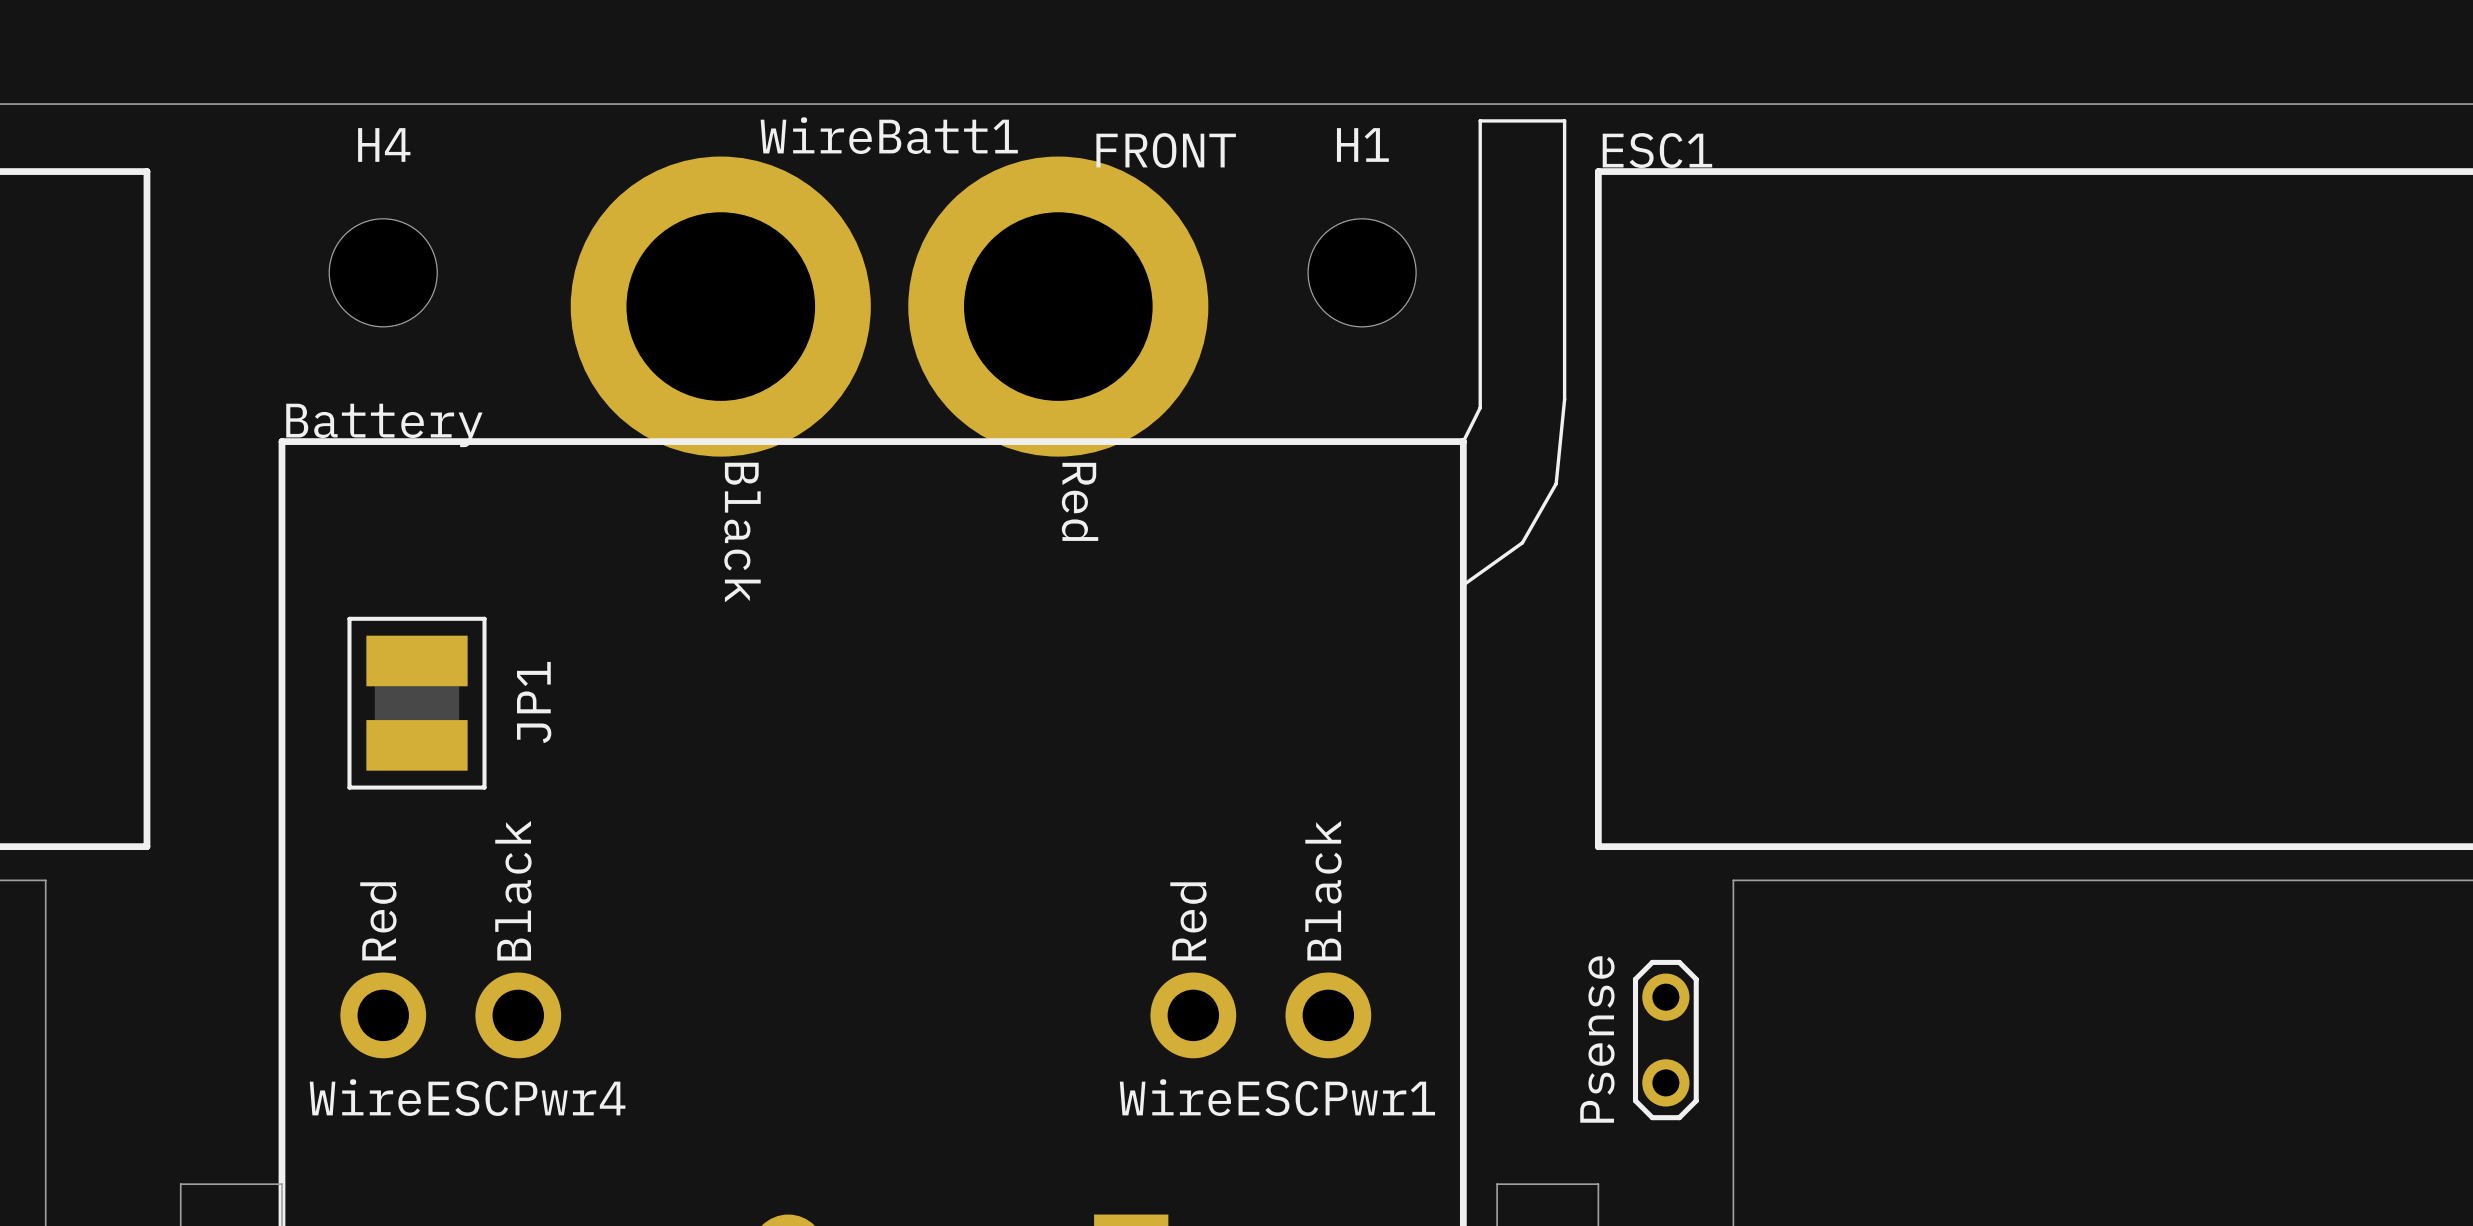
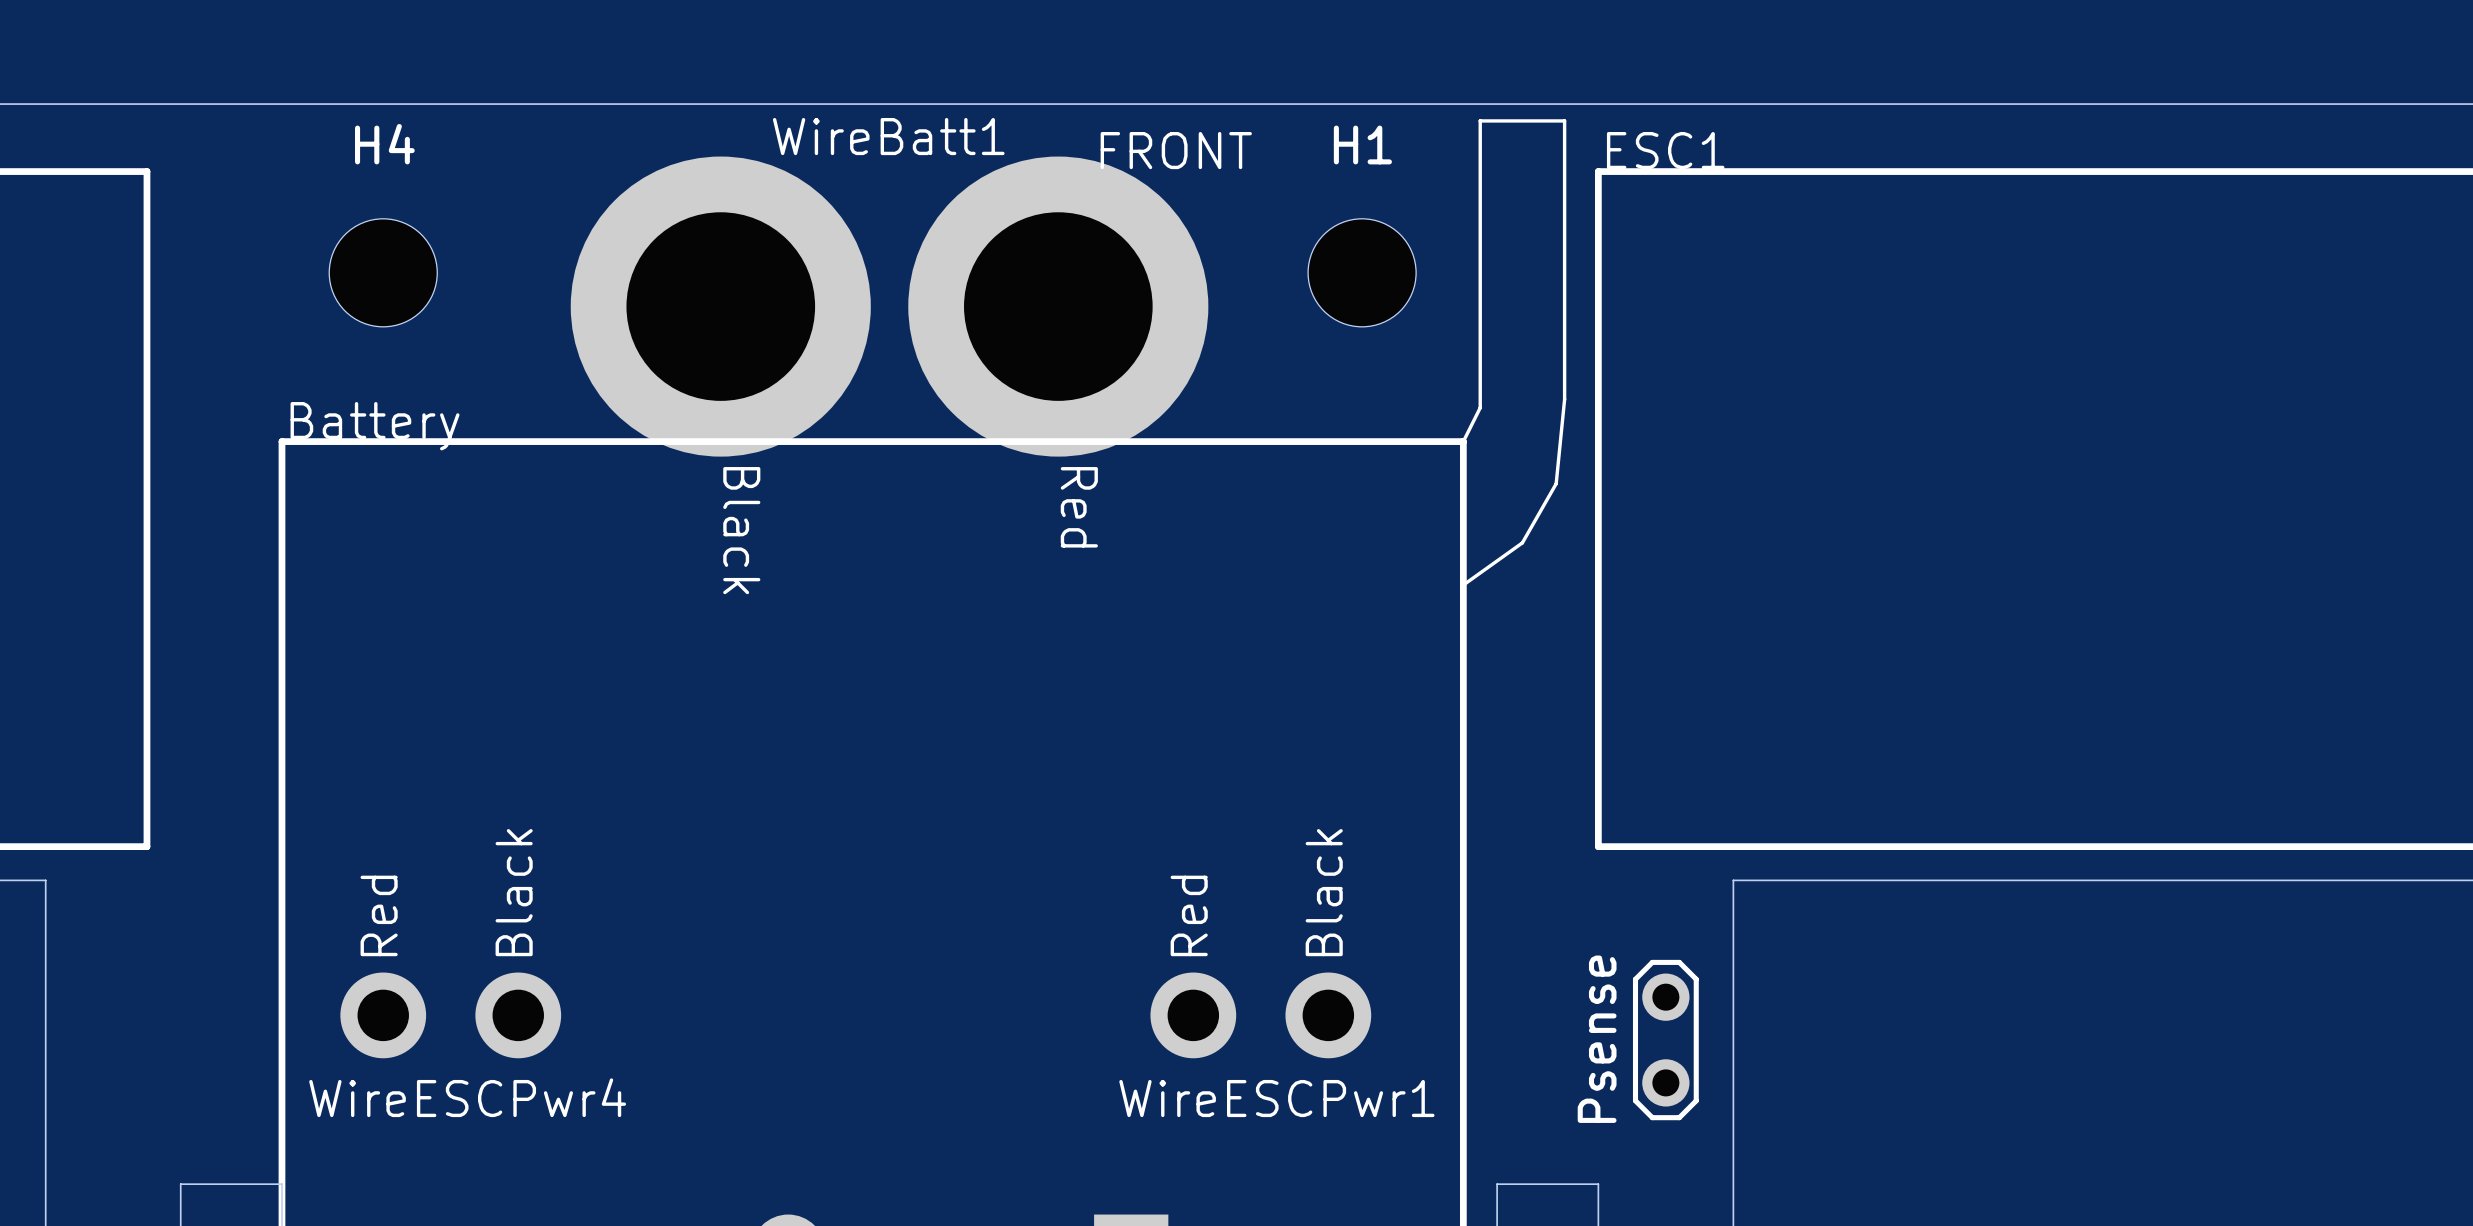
JP1: (417, 703) -> none

